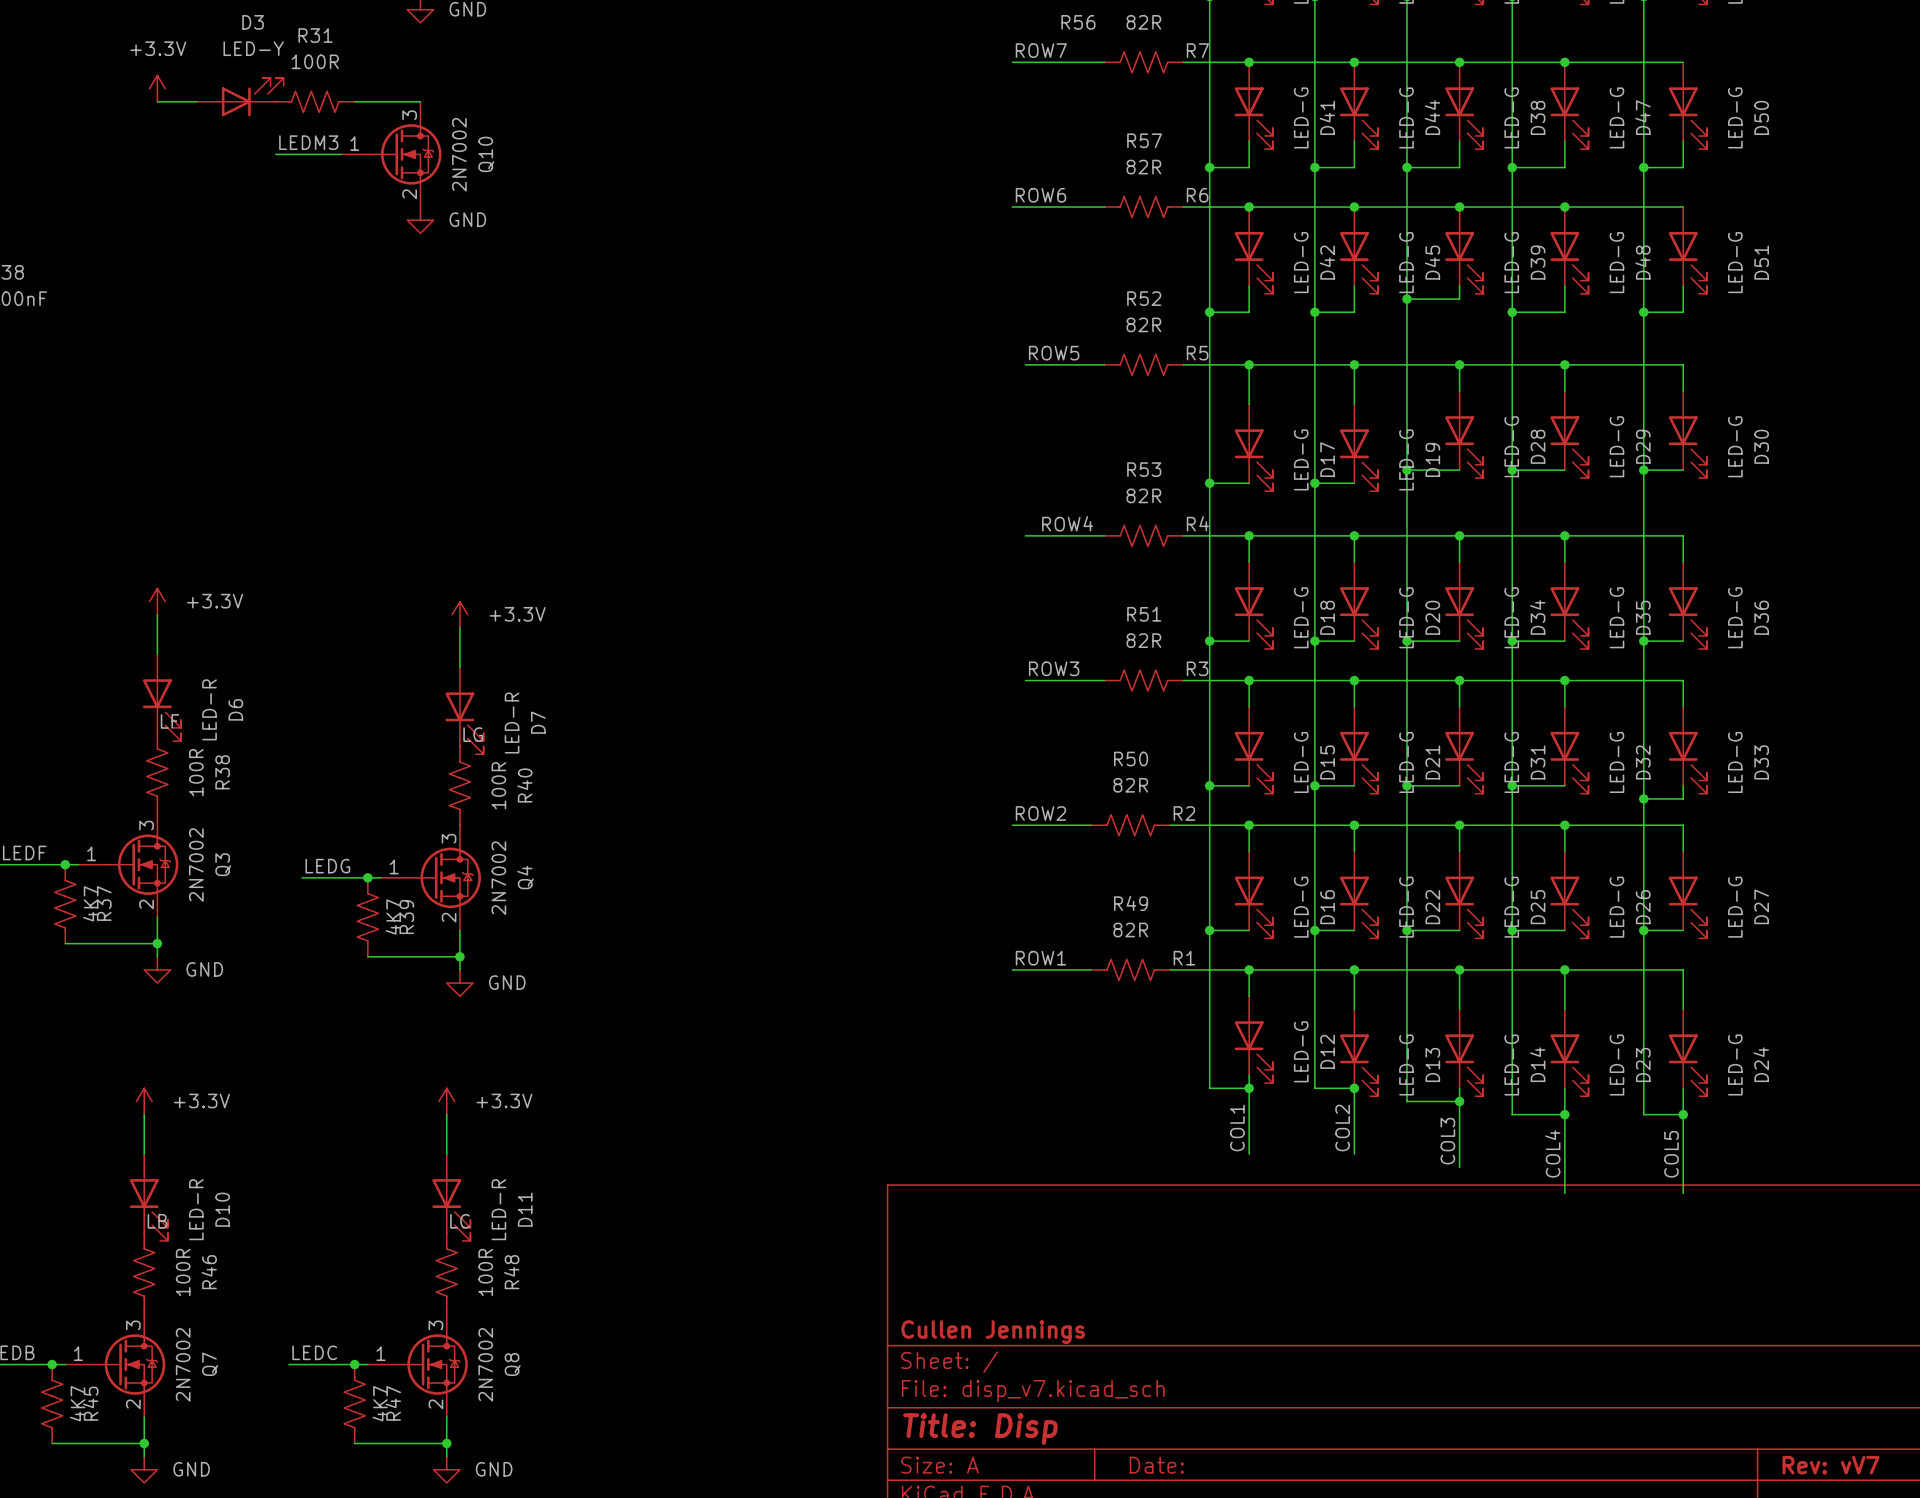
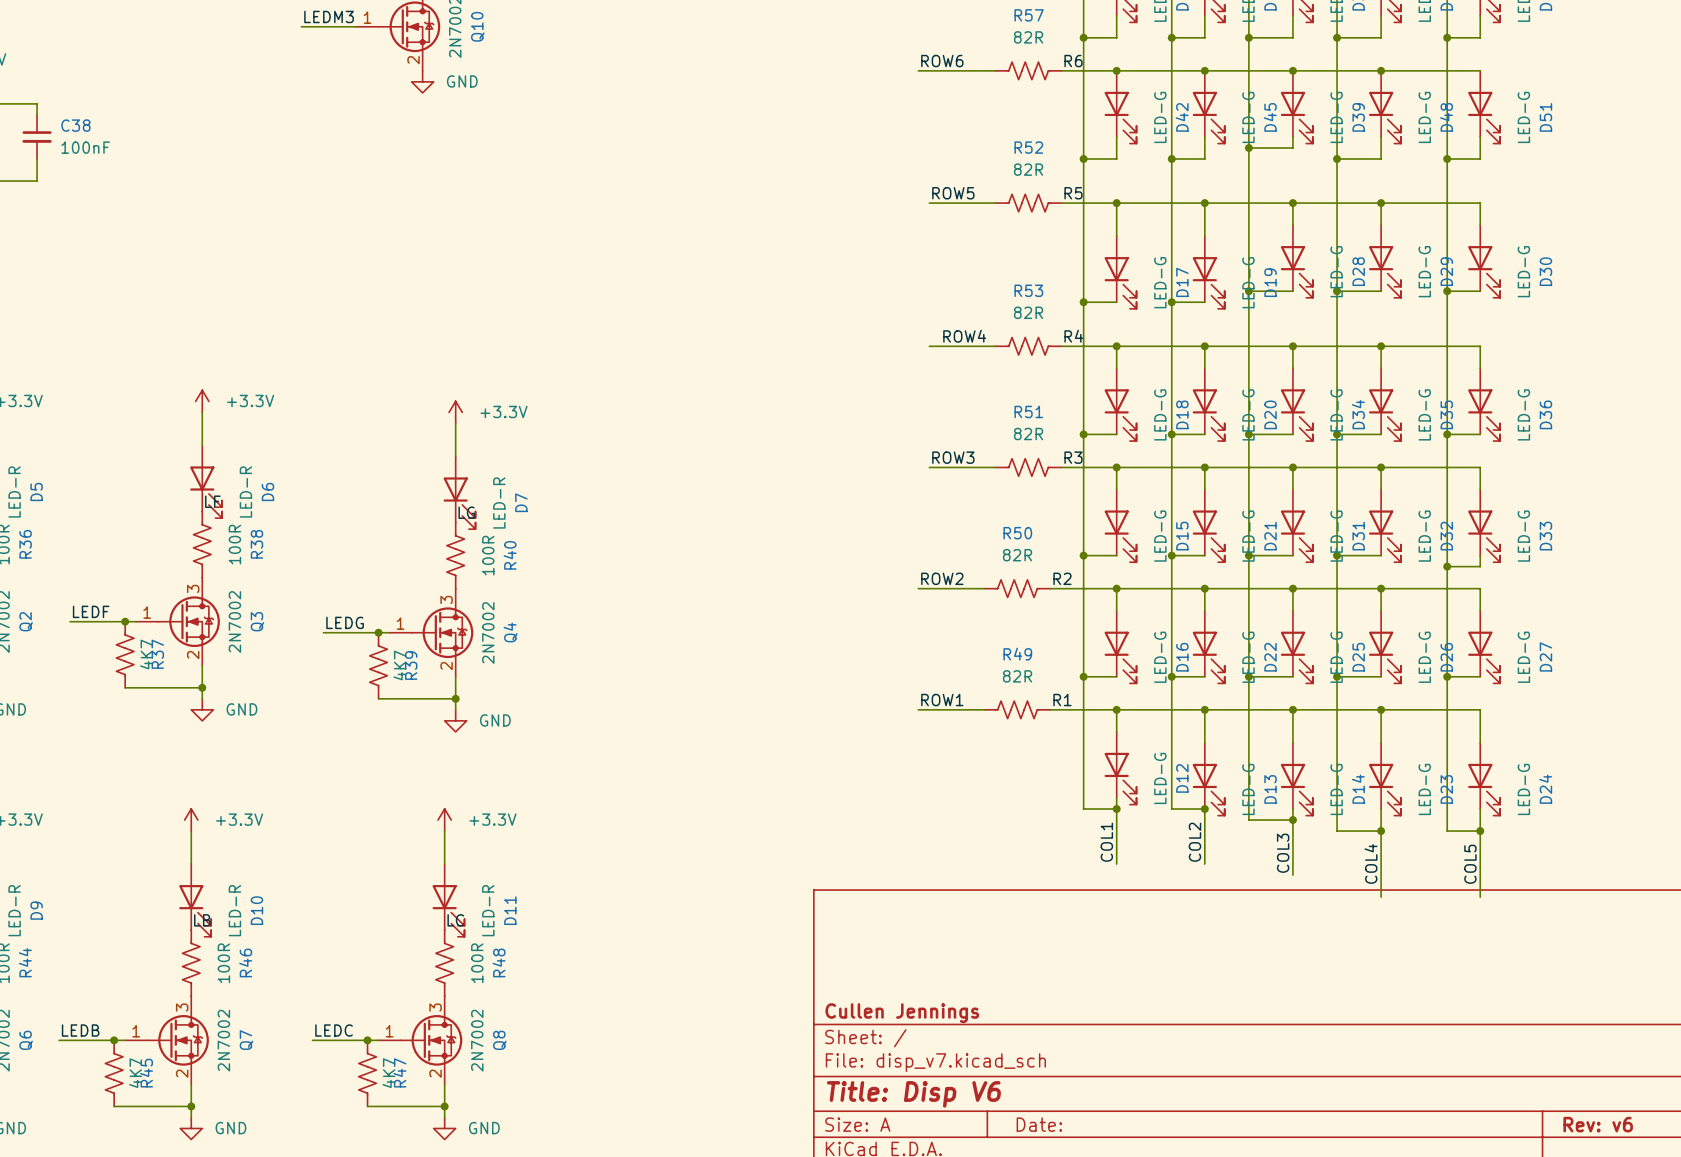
title block: Title: Disp (980, 1429) -> Title: Disp V6 (913, 1094)
title block: Rev: vV7 (1831, 1465) -> Rev: v6 (1598, 1124)

